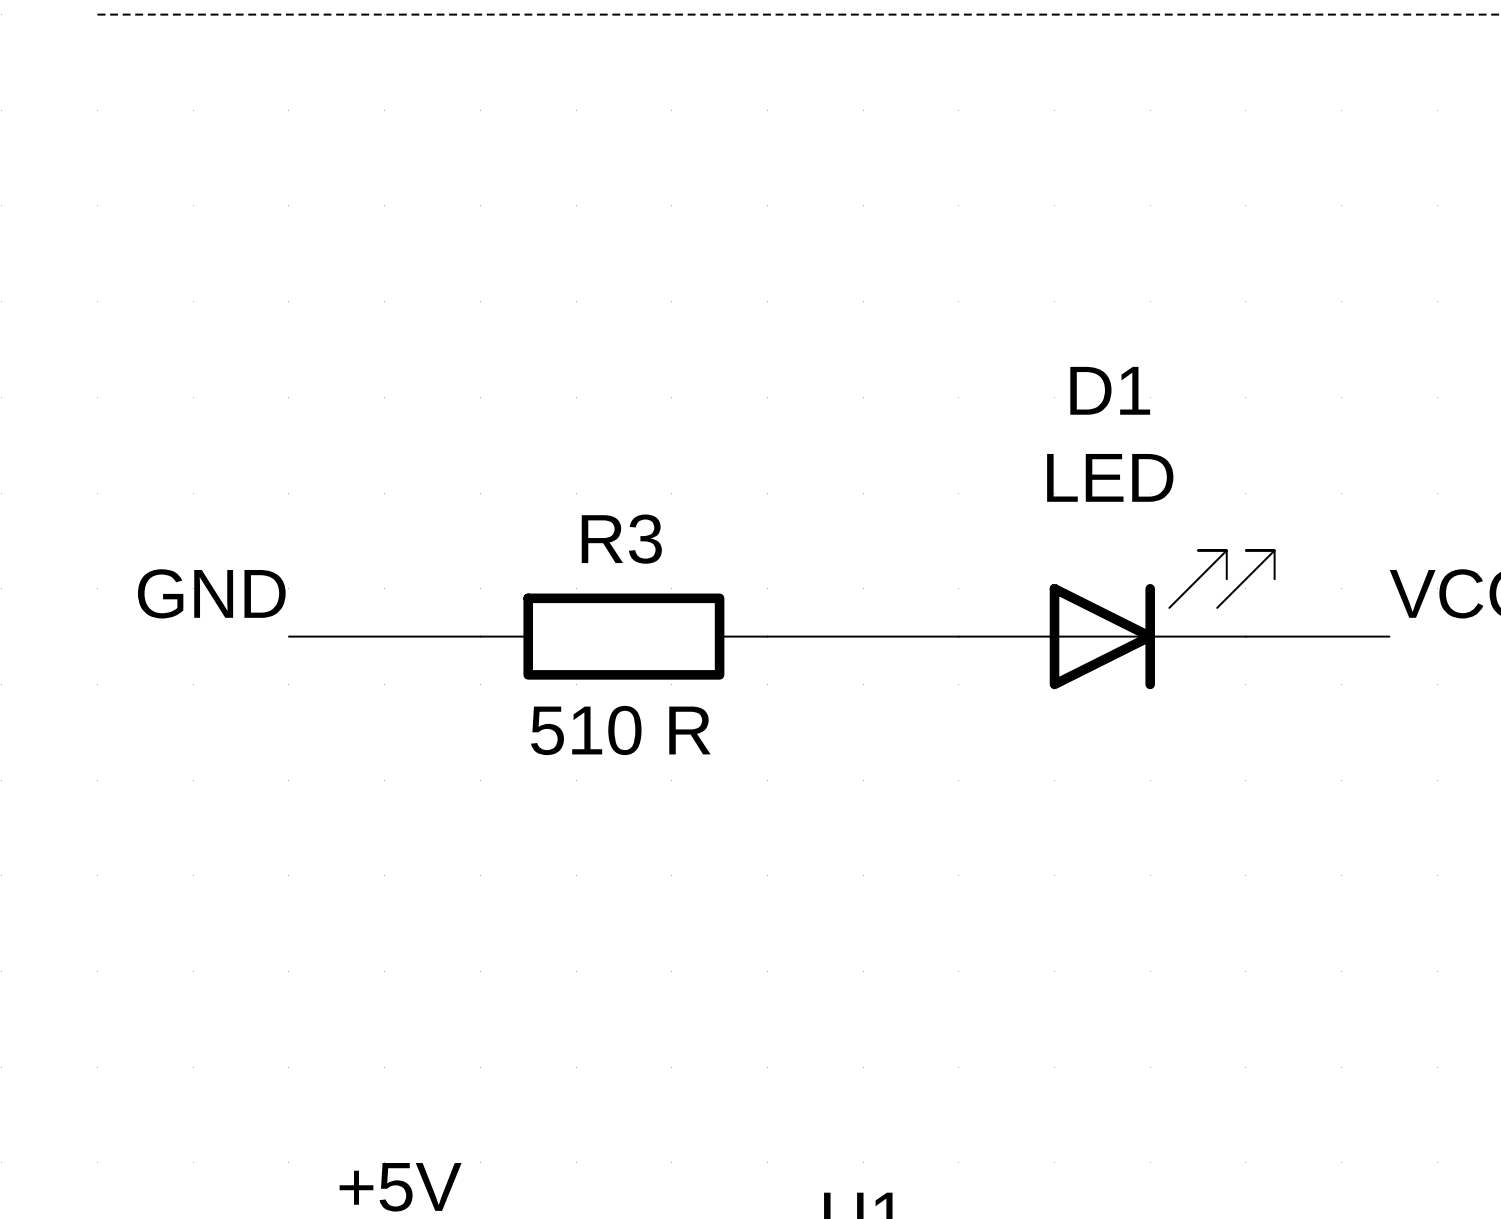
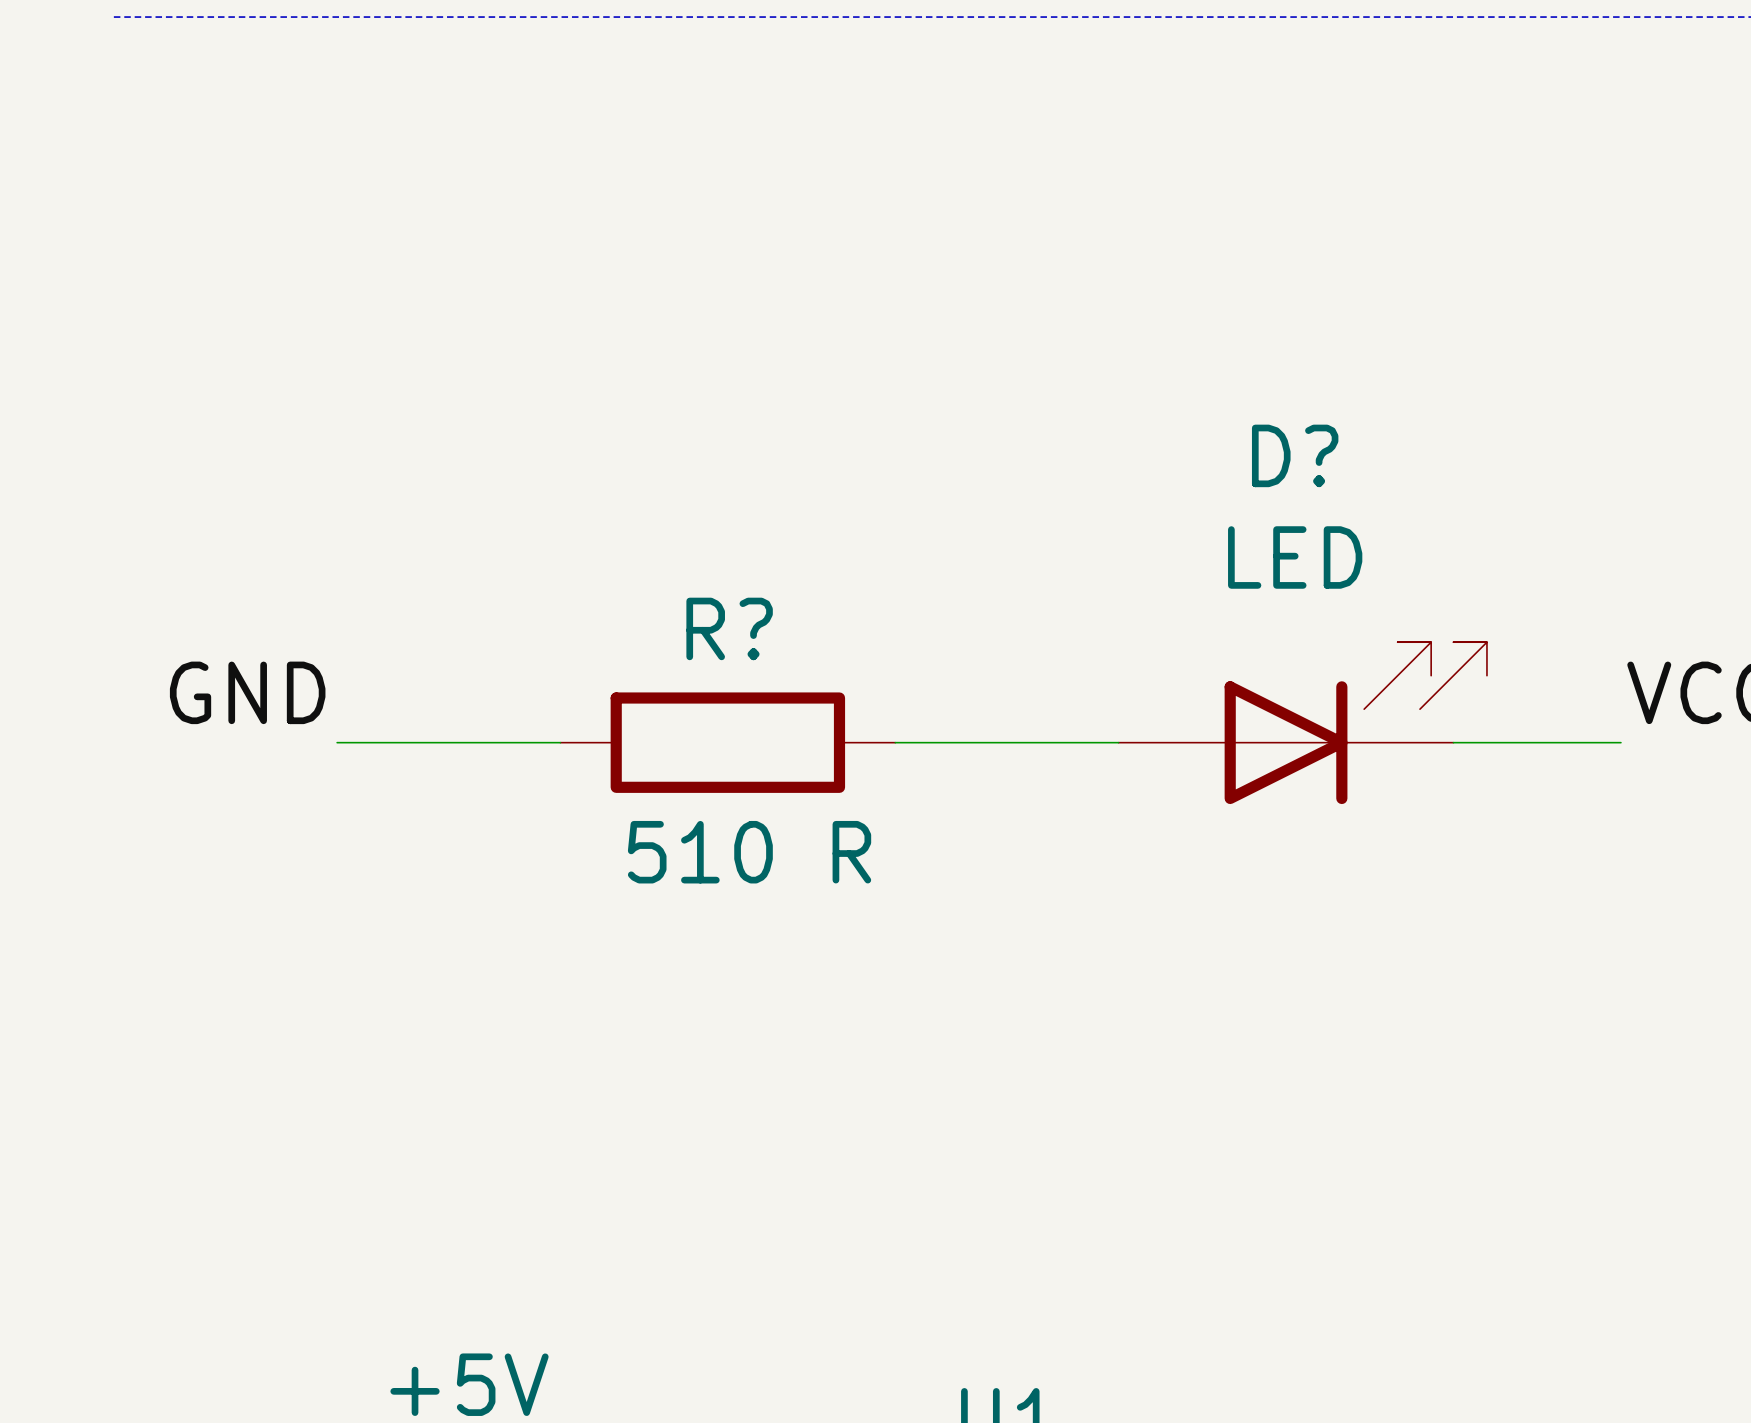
D1 name: D1 (1110, 390) -> D? (1295, 455)
R3 name: R3 (621, 539) -> R? (729, 628)

